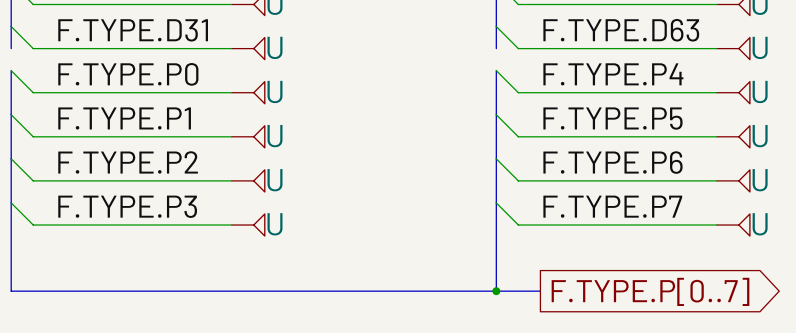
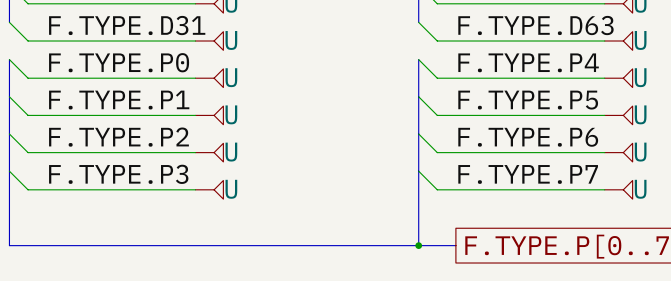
bus: (11, 26) (11, 48) -> none
bus: (496, 26) (496, 48) -> none

